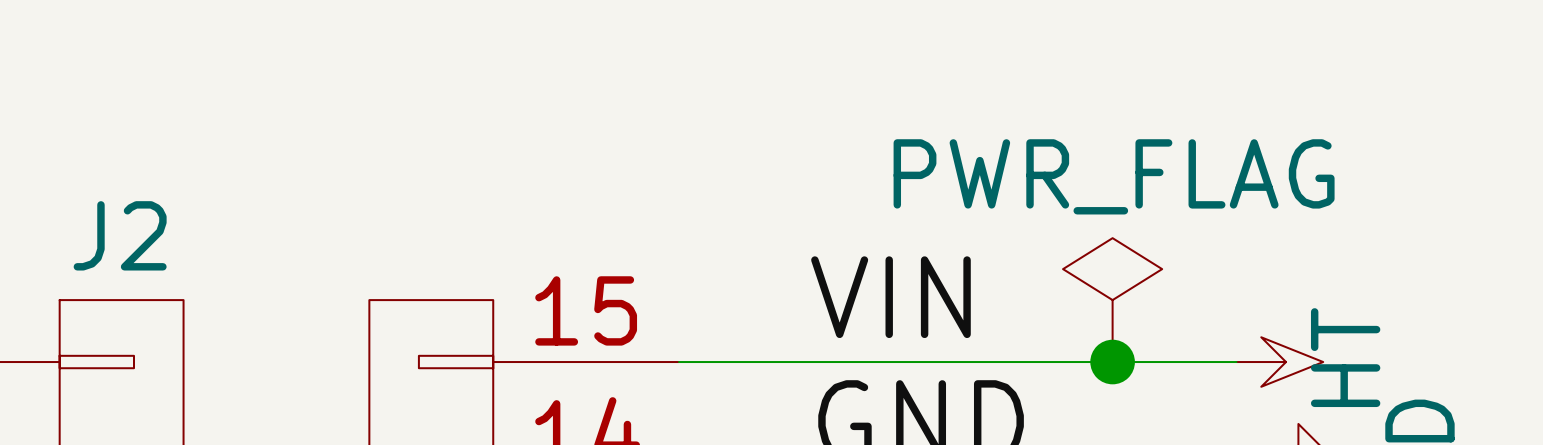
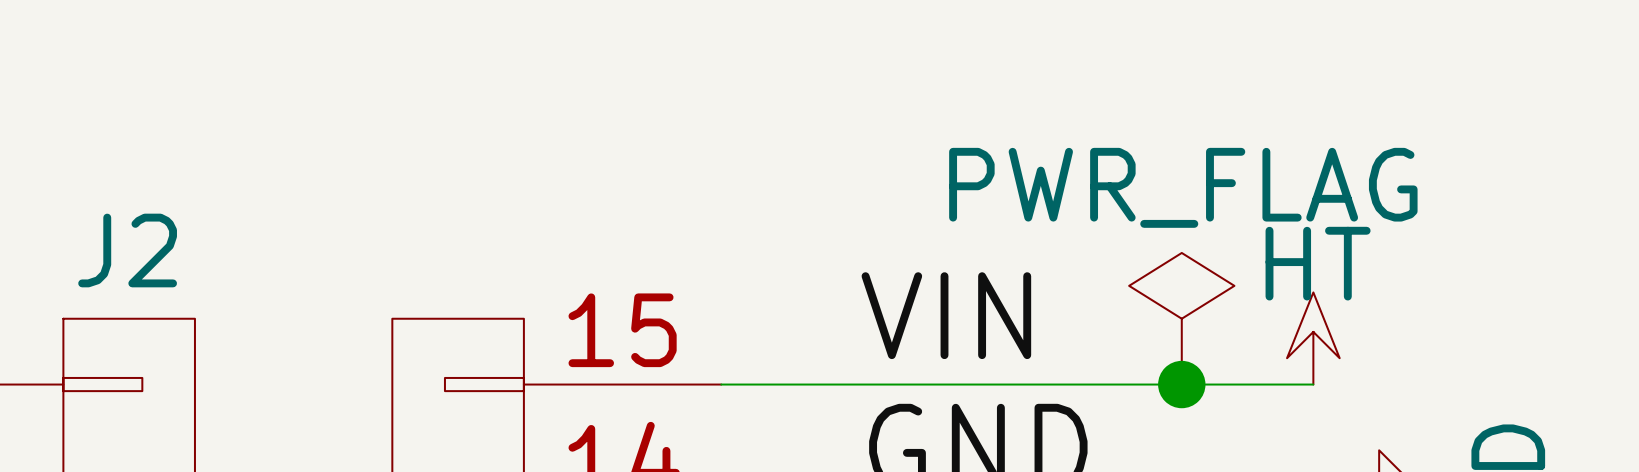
power symbol rotation: 0° (1279, 362) -> 90° counterclockwise (1313, 338)
power symbol position: HT (1279, 362) -> HT (1313, 338)

